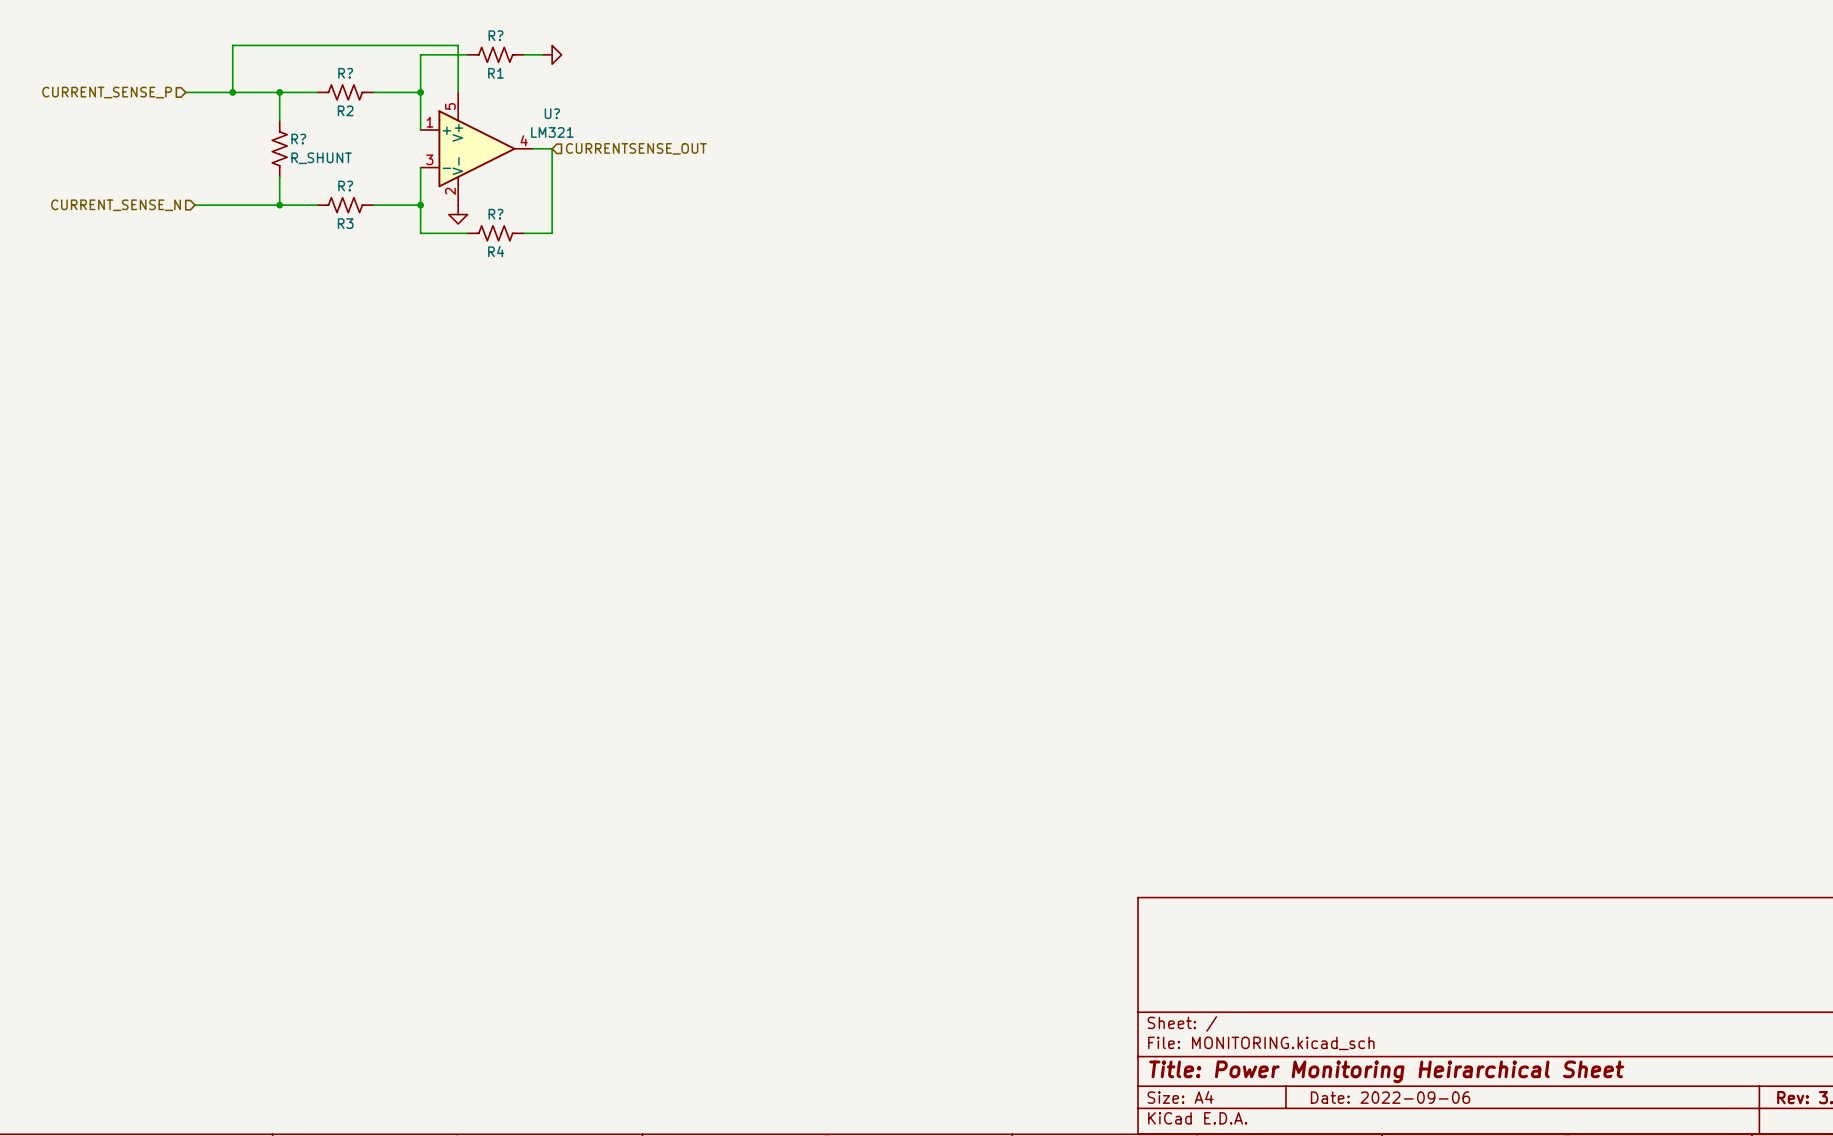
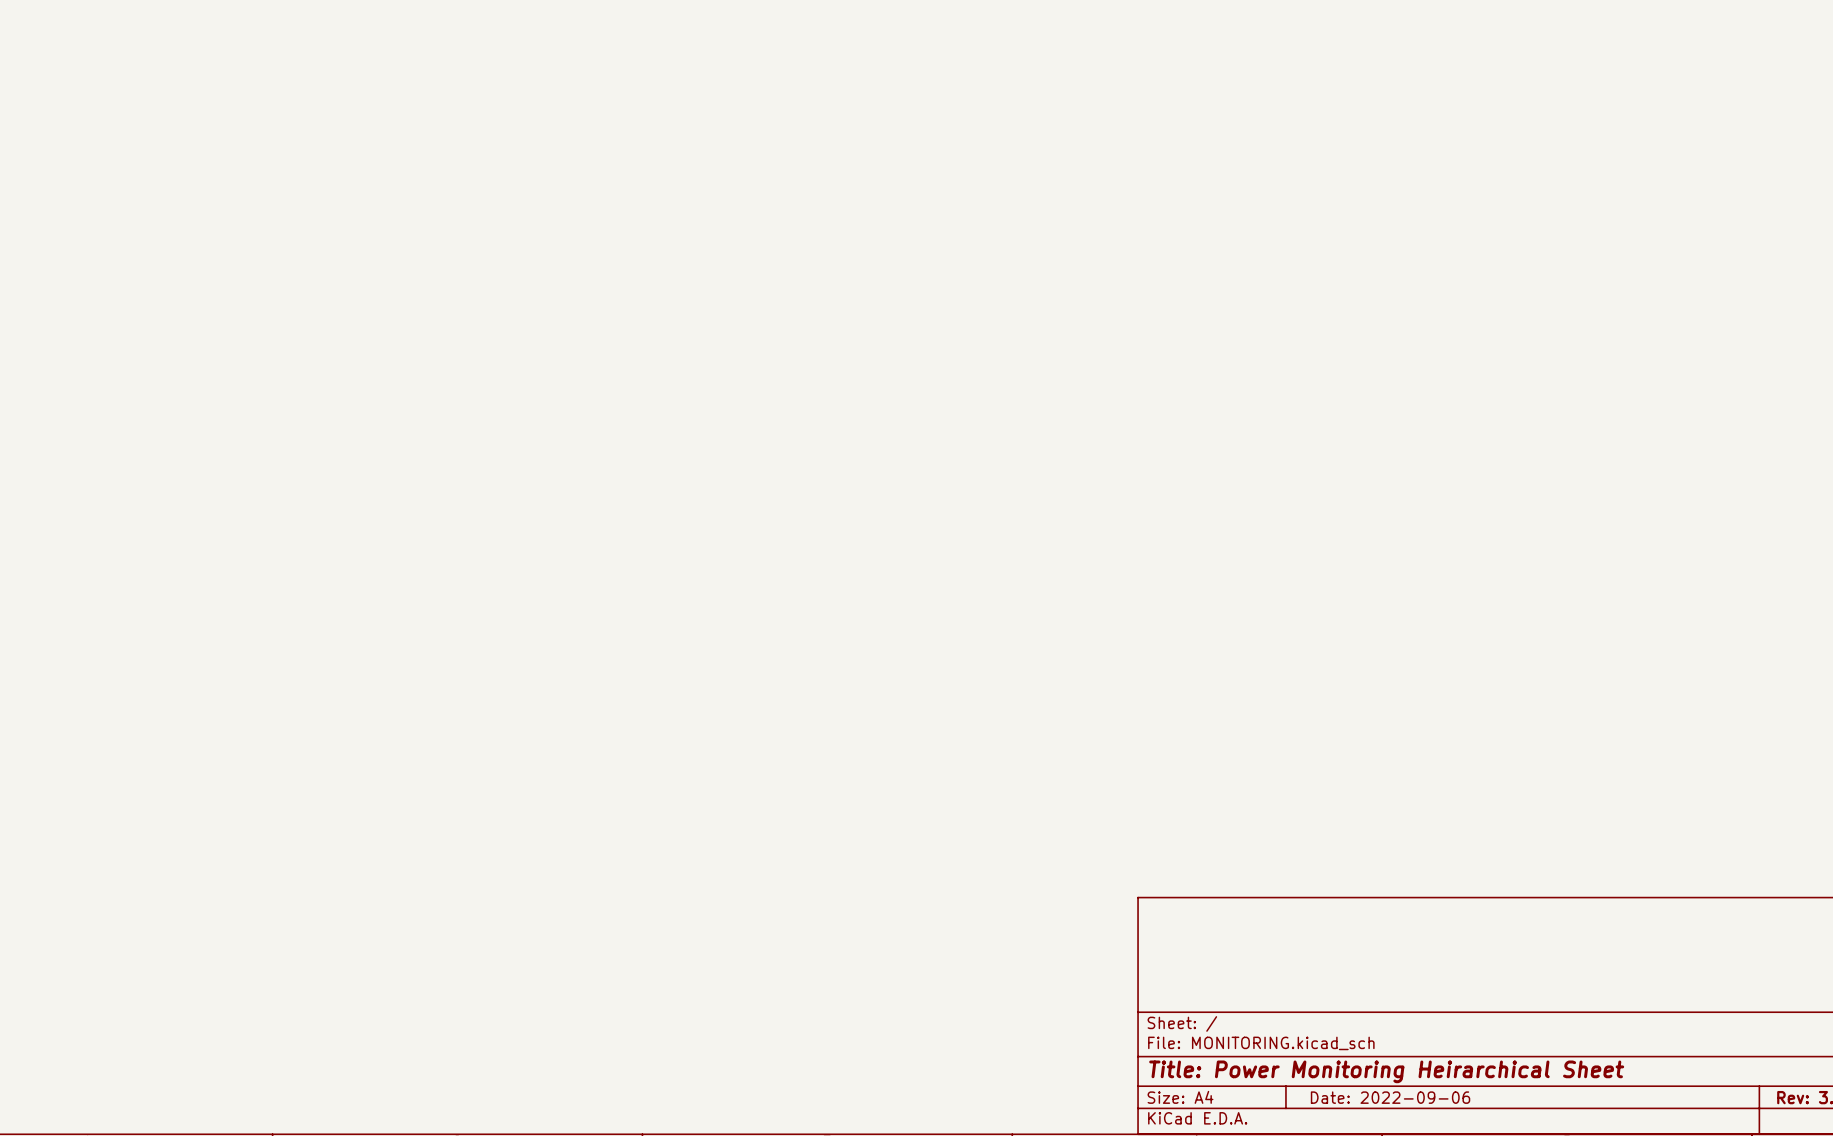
wire: (467, 54) (420, 54) (420, 130) -> none
R?: R1 (495, 54) -> none
wire: (523, 54) (542, 54) -> none
power symbol: (552, 54) -> none
hierarchical label: CURRENT_SENSE_P (107, 92) -> none
wire: (185, 92) (317, 92) -> none
wire: (232, 92) (232, 45) (458, 45) (458, 92) -> none
junction: (232, 92) -> none
wire: (279, 92) (279, 120) -> none
junction: (279, 92) -> none
R?: R2 (345, 92) -> none
wire: (373, 92) (420, 92) -> none
junction: (420, 92) -> none
R?: R_SHUNT (279, 148) -> none
U?: LM321 (476, 148) -> none
wire: (533, 148) (552, 148) (552, 233) (523, 233) -> none
hierarchical label: CURRENTSENSE_OUT (636, 148) -> none
wire: (420, 167) (420, 233) (467, 233) -> none
wire: (279, 176) (279, 205) -> none
hierarchical label: CURRENT_SENSE_N (116, 205) -> none
wire: (195, 205) (317, 205) -> none
junction: (279, 205) -> none
R?: R3 (345, 205) -> none
wire: (373, 205) (420, 205) -> none
junction: (420, 205) -> none
power symbol: (458, 214) -> none
R?: R4 (495, 233) -> none

